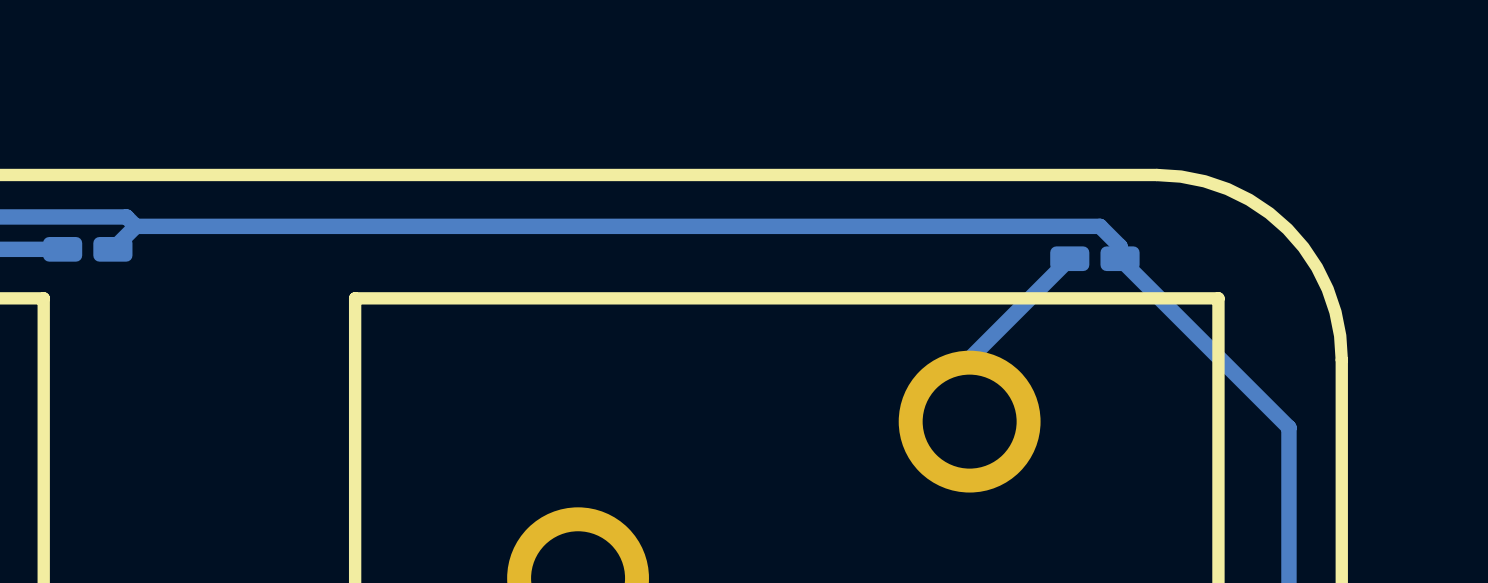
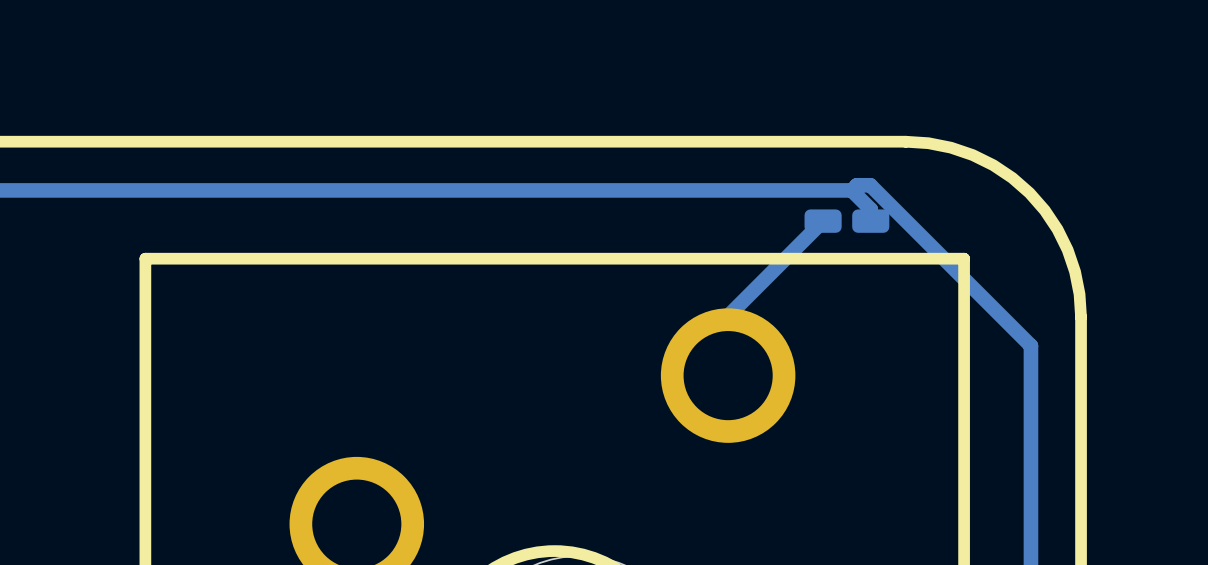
bottom track: (1120, 258) (1288, 427) -> (851, 190) (856, 185) (870, 185) (1030, 345) (1030, 381)

